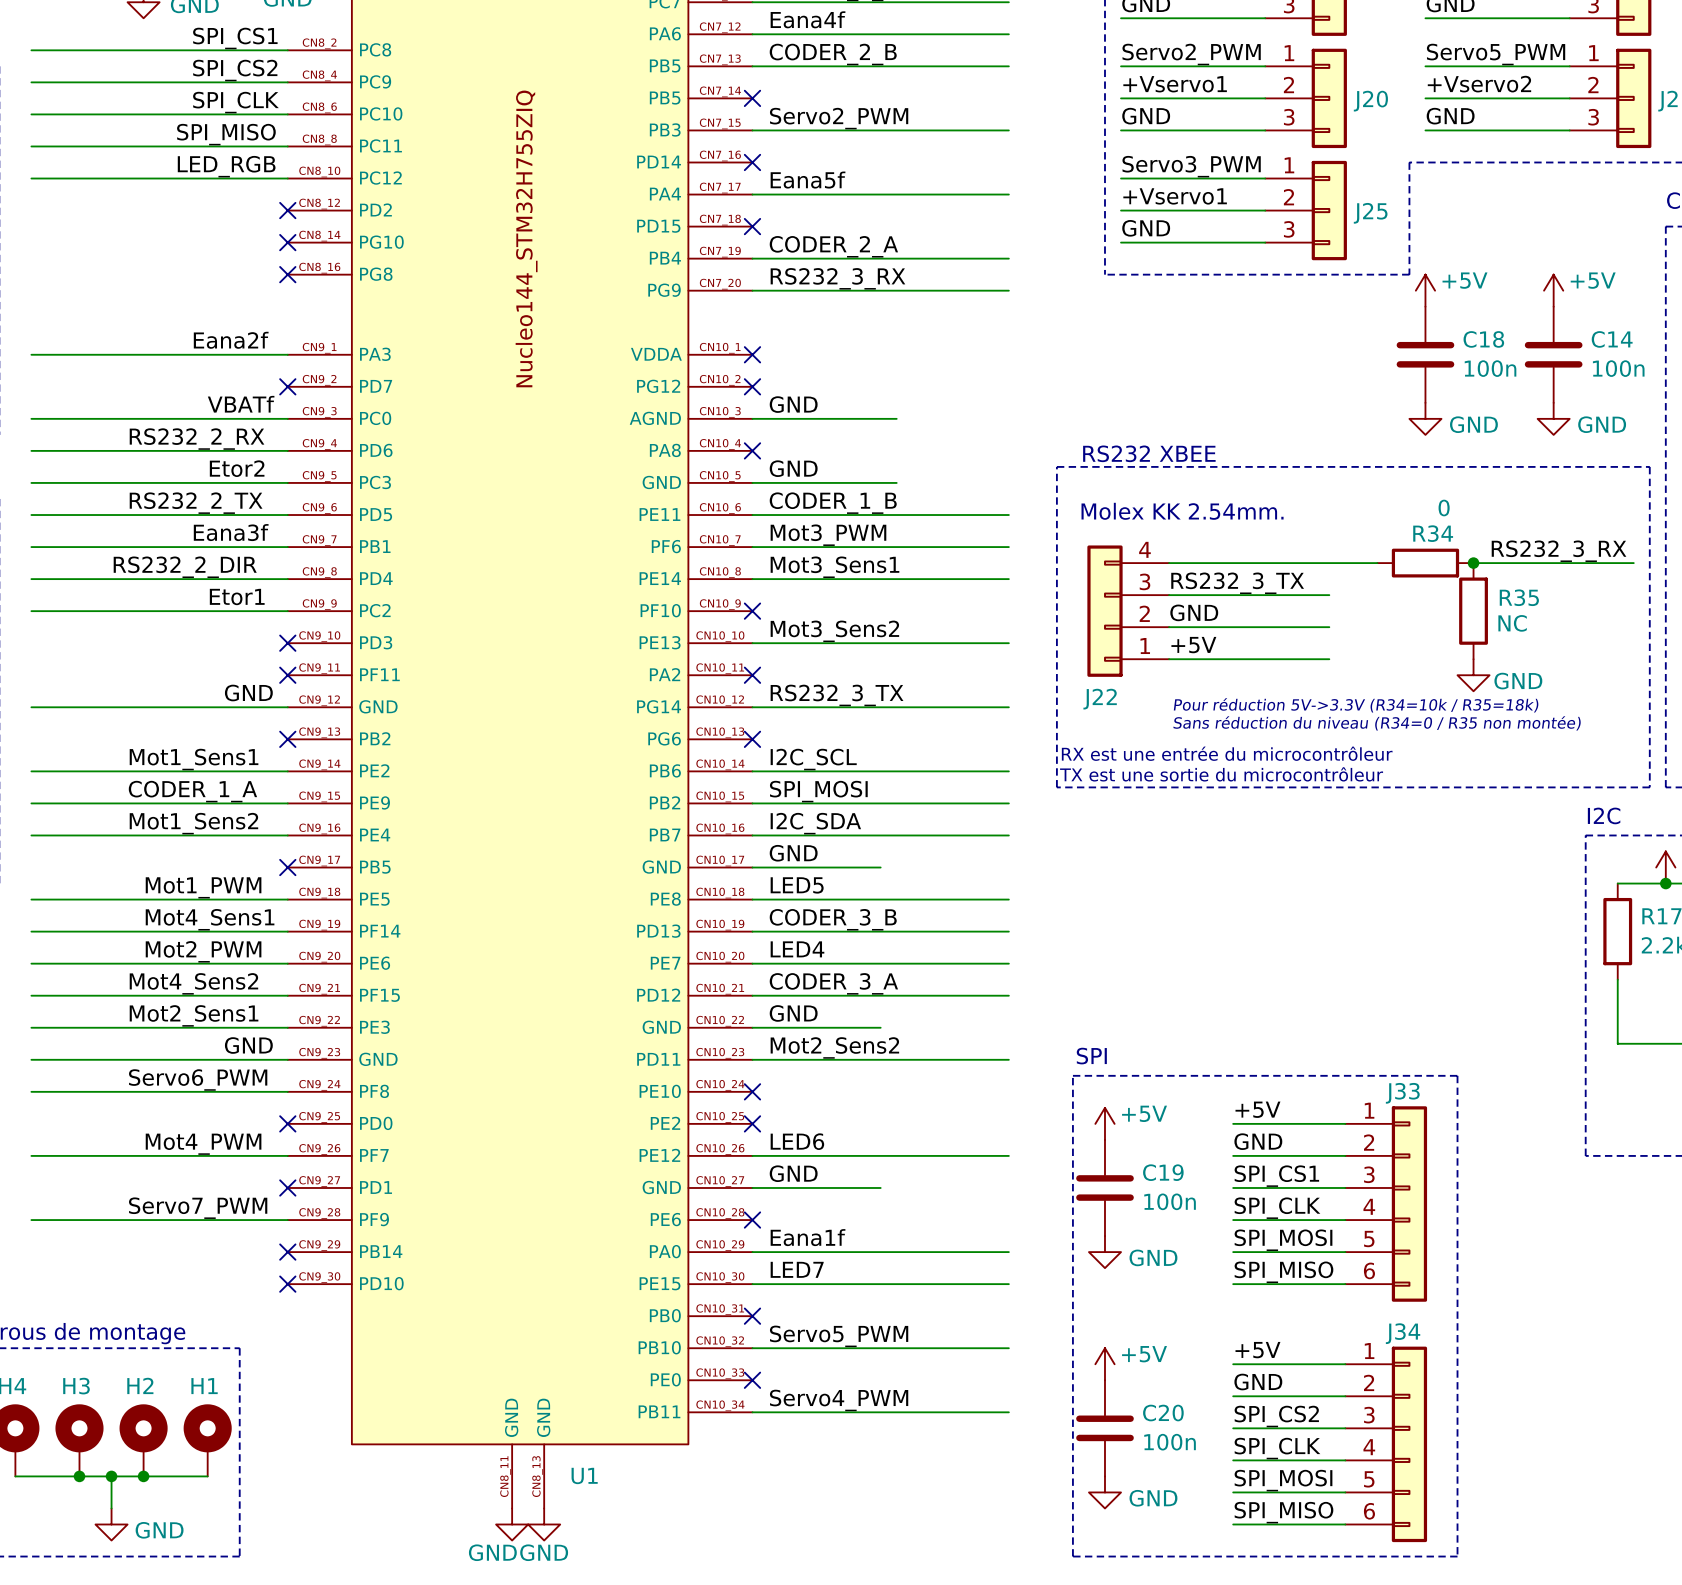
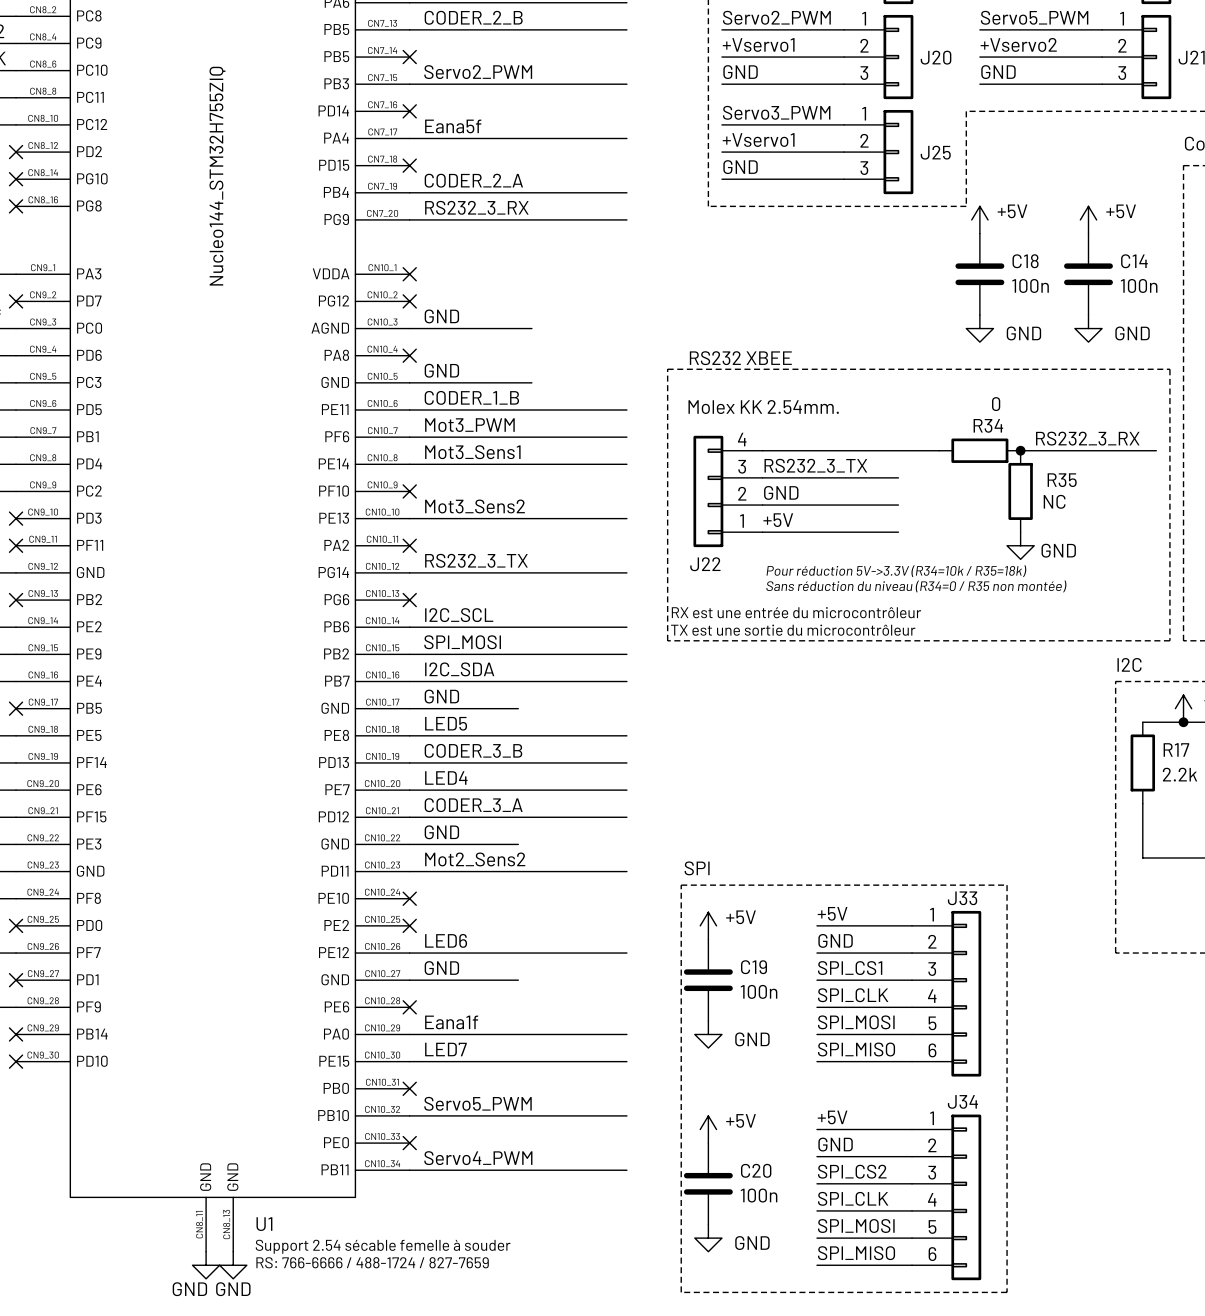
text: none -> Support 2.54 sécable femelle à souder (383, 1246)
text: none -> RS: 766-6666 / 488-1724 / 827-7659 (372, 1262)

